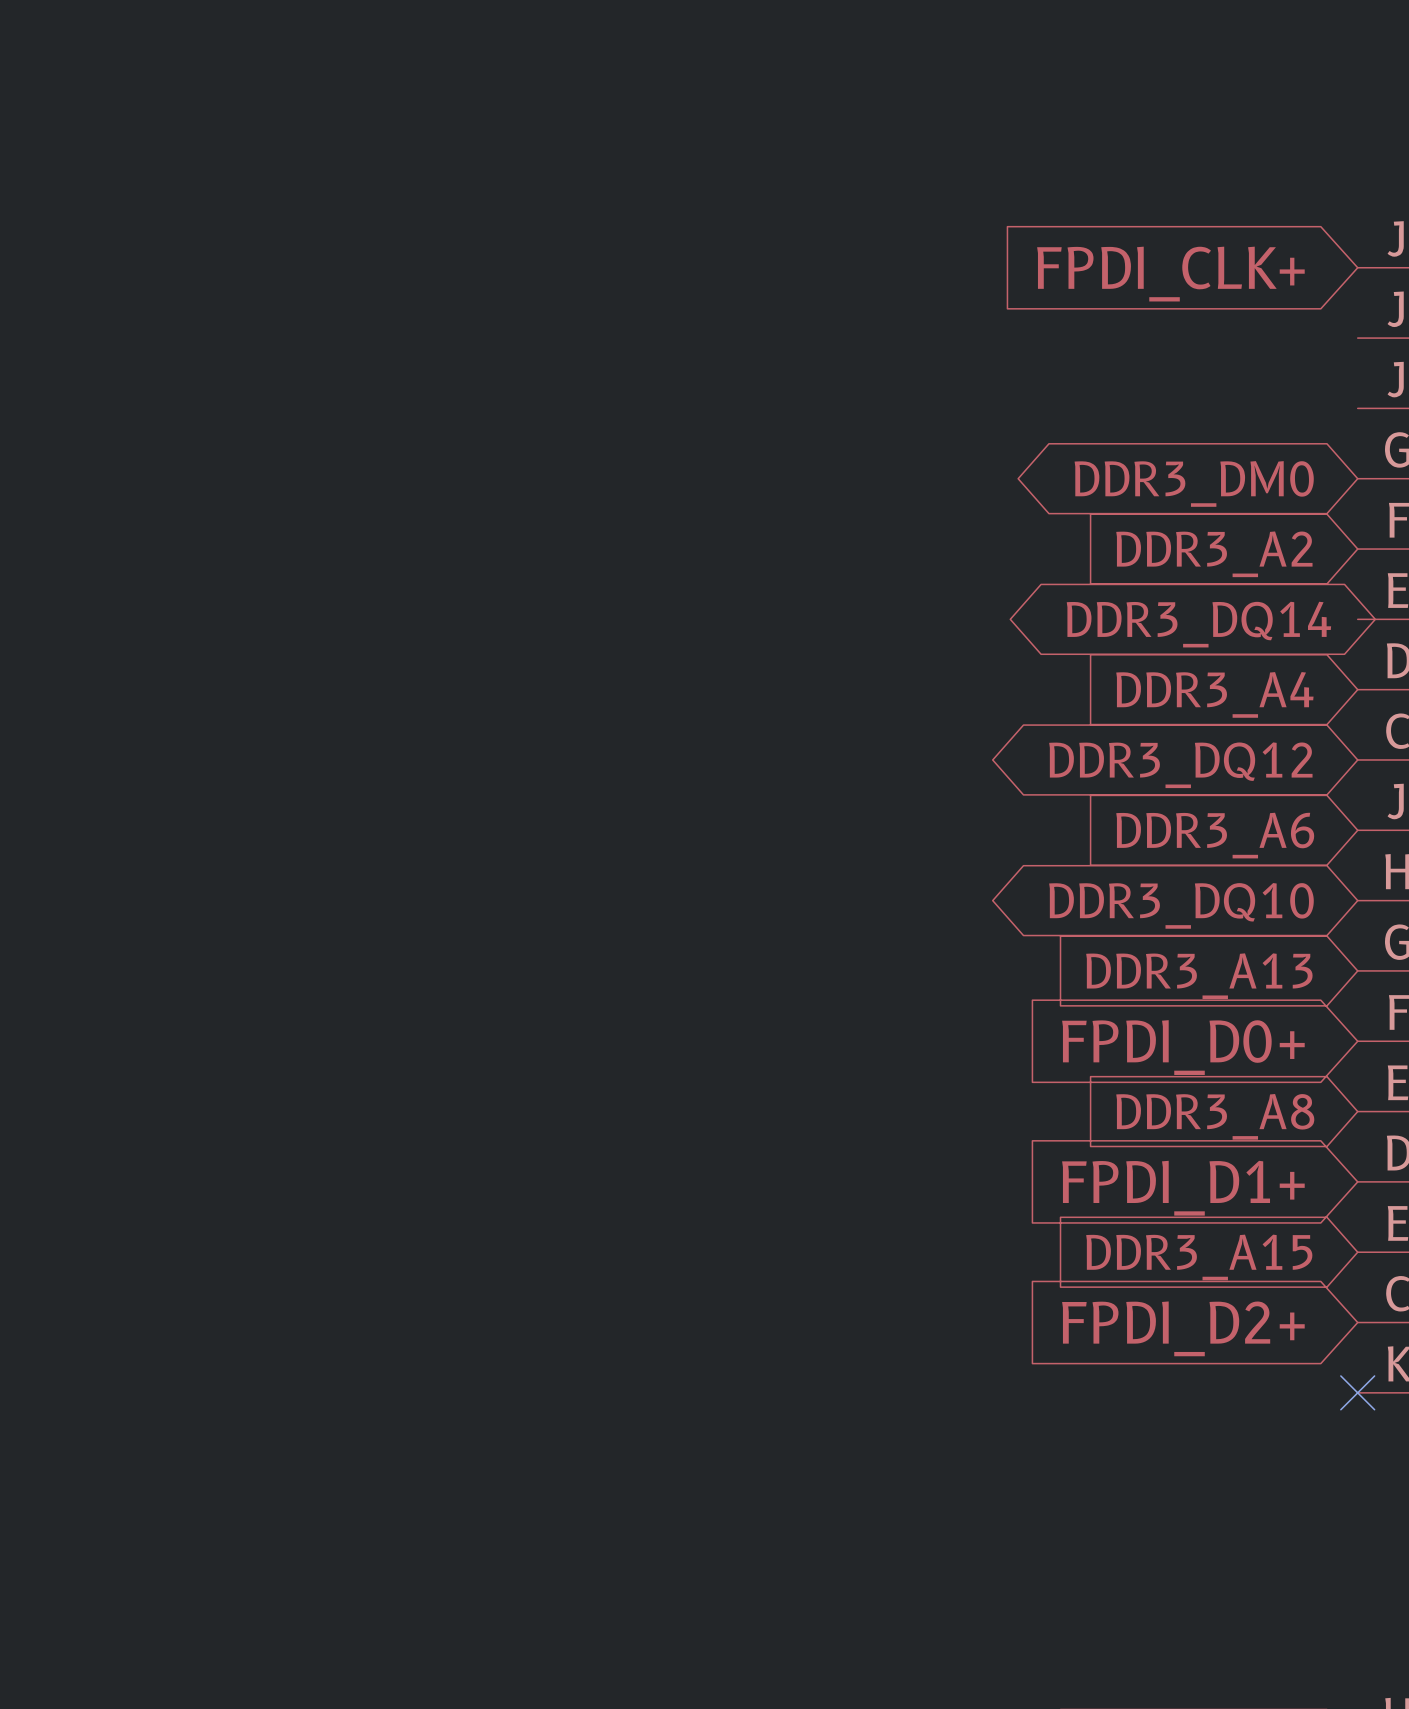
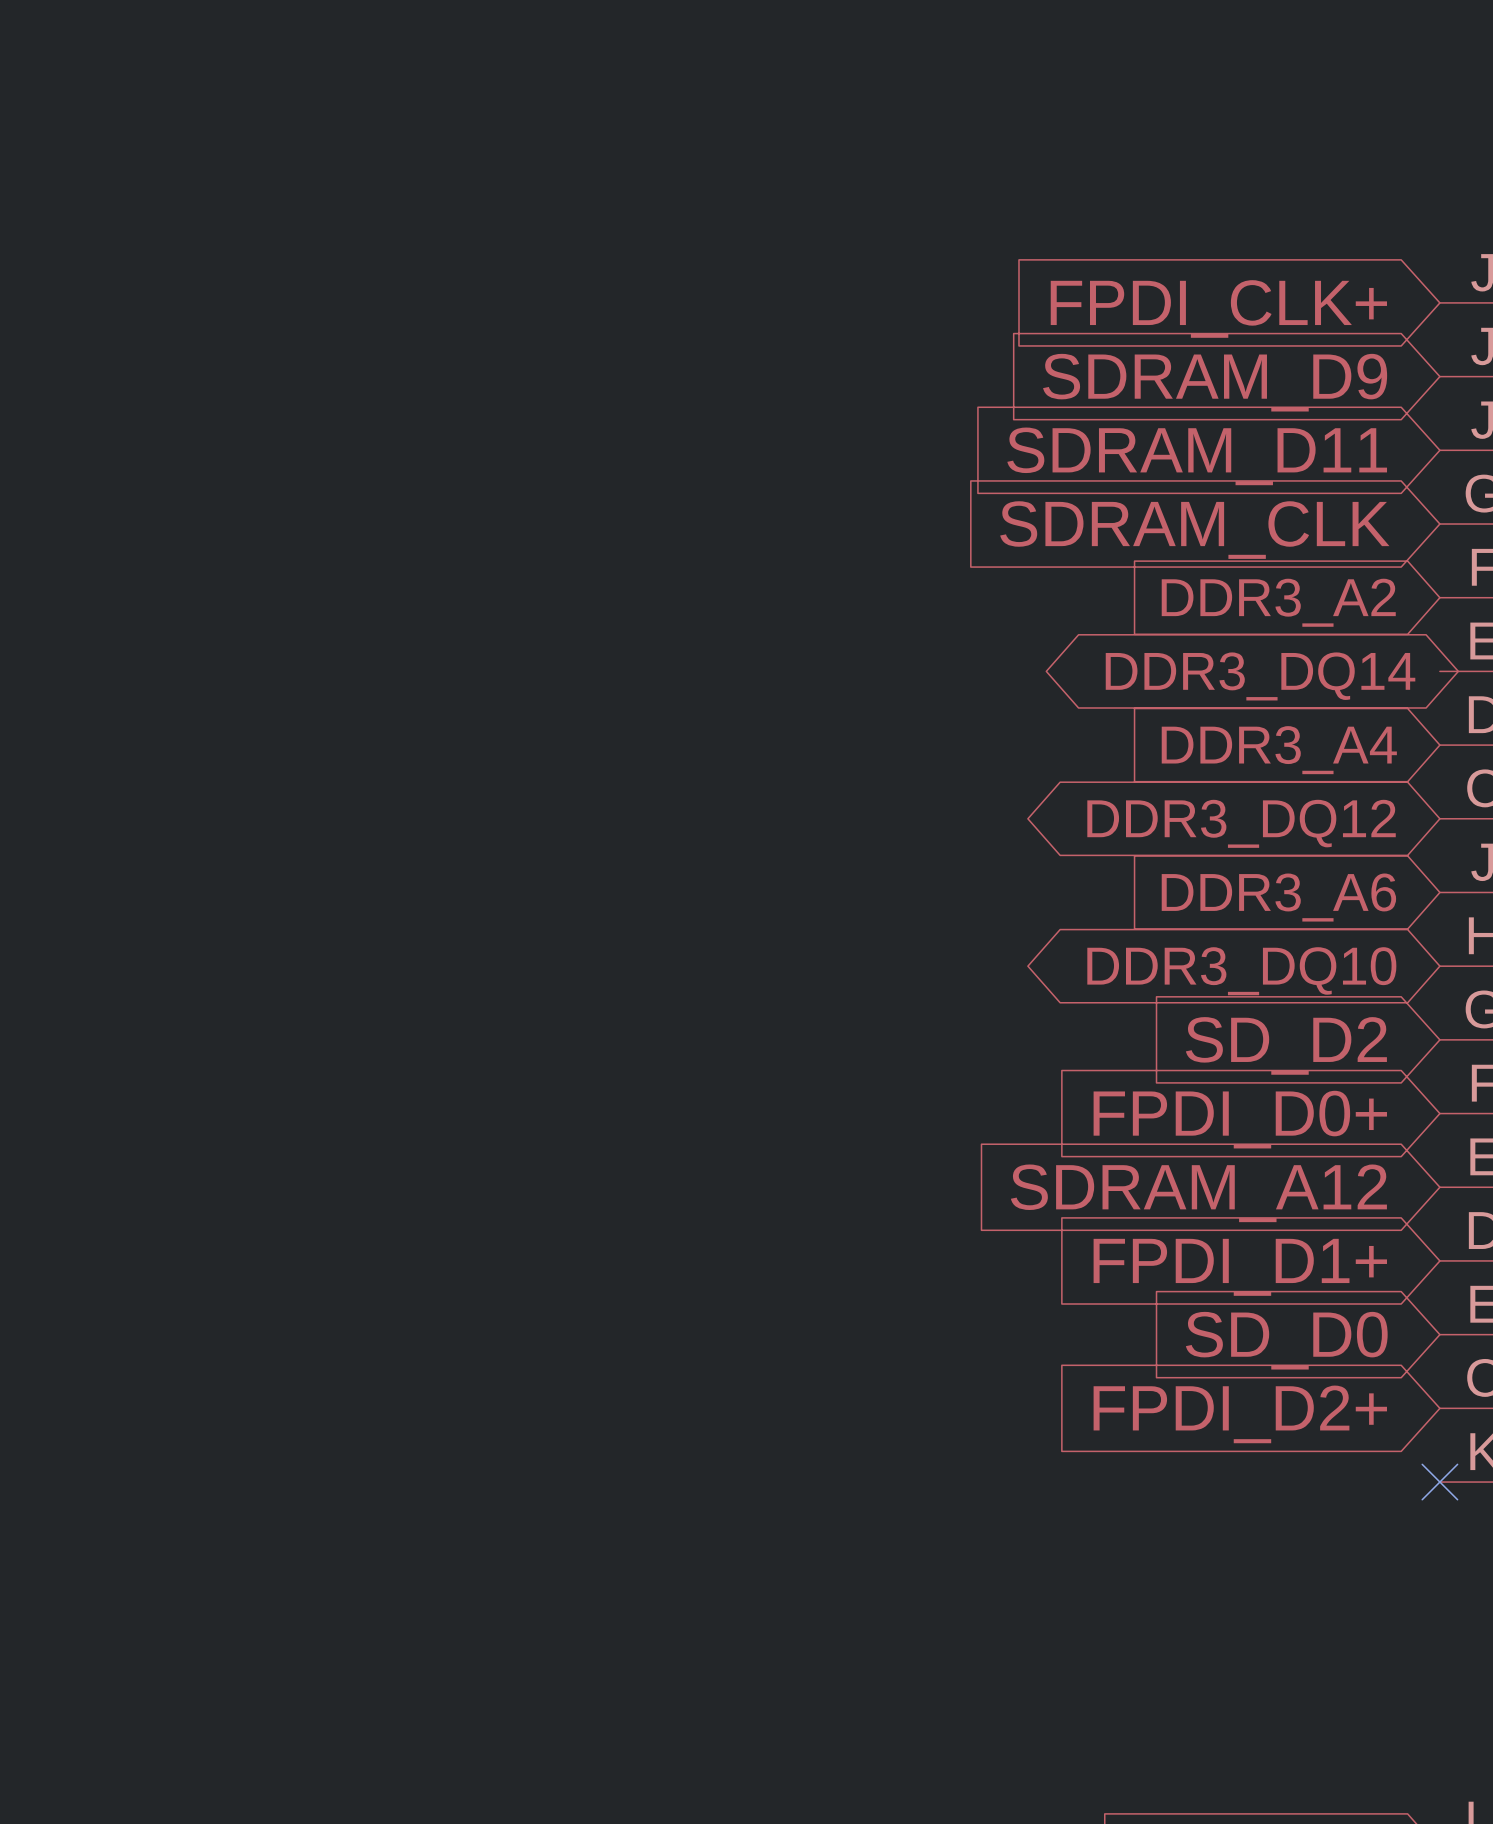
global label: none -> SDRAM_D9 (1215, 382)
global label: none -> SDRAM_D11 (1197, 456)
global label shape: bidirectional (1194, 483) -> input (1194, 530)
global label: DDR3_DM0 (1194, 483) -> SDRAM_CLK (1194, 530)
global label: DDR3_A13 (1199, 976) -> SD_D2 (1286, 1045)
global label: DDR3_A8 (1215, 1116) -> SDRAM_A12 (1198, 1193)
global label: DDR3_A15 (1199, 1257) -> SD_D0 (1286, 1340)

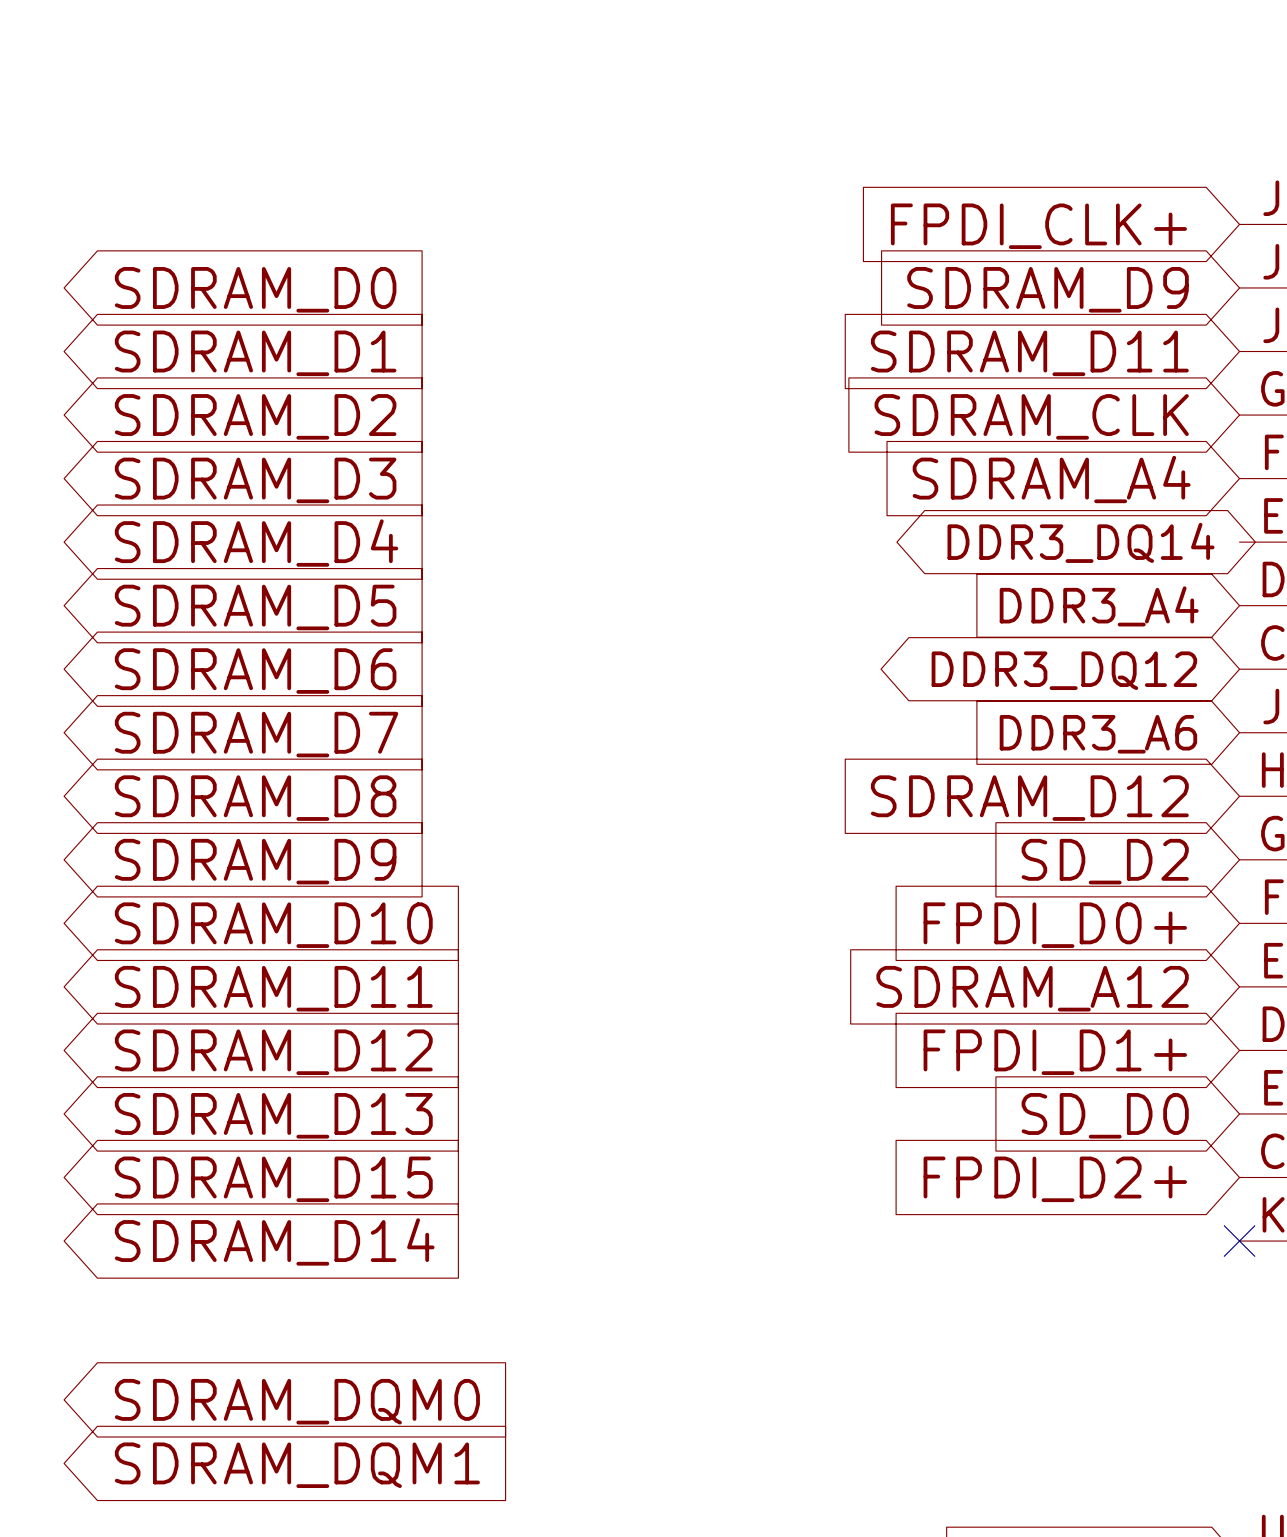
global label: none -> SDRAM_D0 (255, 289)
global label: none -> SDRAM_D1 (255, 353)
global label: none -> SDRAM_D2 (255, 416)
global label: DDR3_A2 (1278, 602) -> SDRAM_A4 (1051, 479)
global label: none -> SDRAM_D3 (255, 480)
global label: none -> SDRAM_D4 (256, 543)
global label: none -> SDRAM_D5 (255, 607)
global label: none -> SDRAM_D6 (255, 671)
global label: none -> SDRAM_D7 (256, 734)
global label shape: bidirectional (1241, 971) -> input (1029, 798)
global label: DDR3_DQ10 (1241, 971) -> SDRAM_D12 (1029, 798)
global label: none -> SDRAM_D8 (255, 798)
global label: none -> SDRAM_D9 (255, 861)
global label: none -> SDRAM_D10 (273, 925)
global label: none -> SDRAM_D11 (273, 988)
global label: none -> SDRAM_D12 (273, 1052)
global label: none -> SDRAM_D13 (273, 1115)
global label: none -> SDRAM_D15 (273, 1179)
global label: none -> SDRAM_D14 (274, 1241)
global label: none -> SDRAM_DQM0 (297, 1401)
global label: none -> SDRAM_DQM1 (297, 1465)

